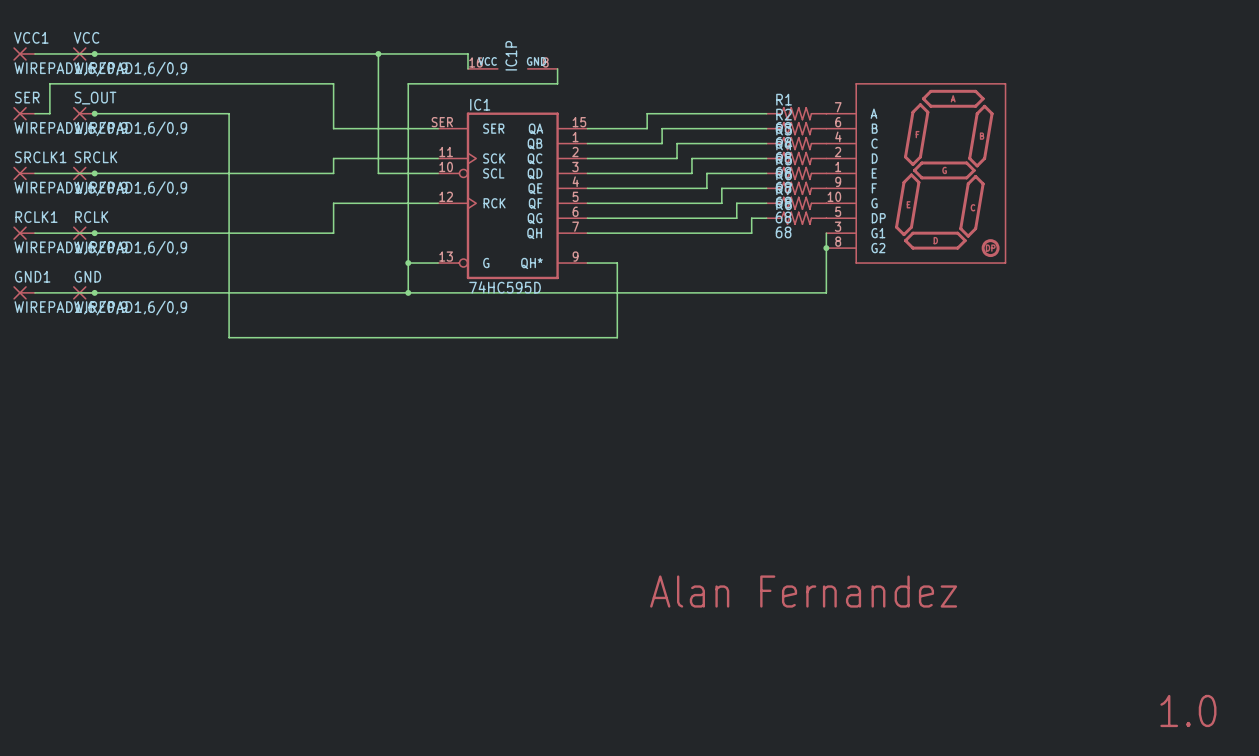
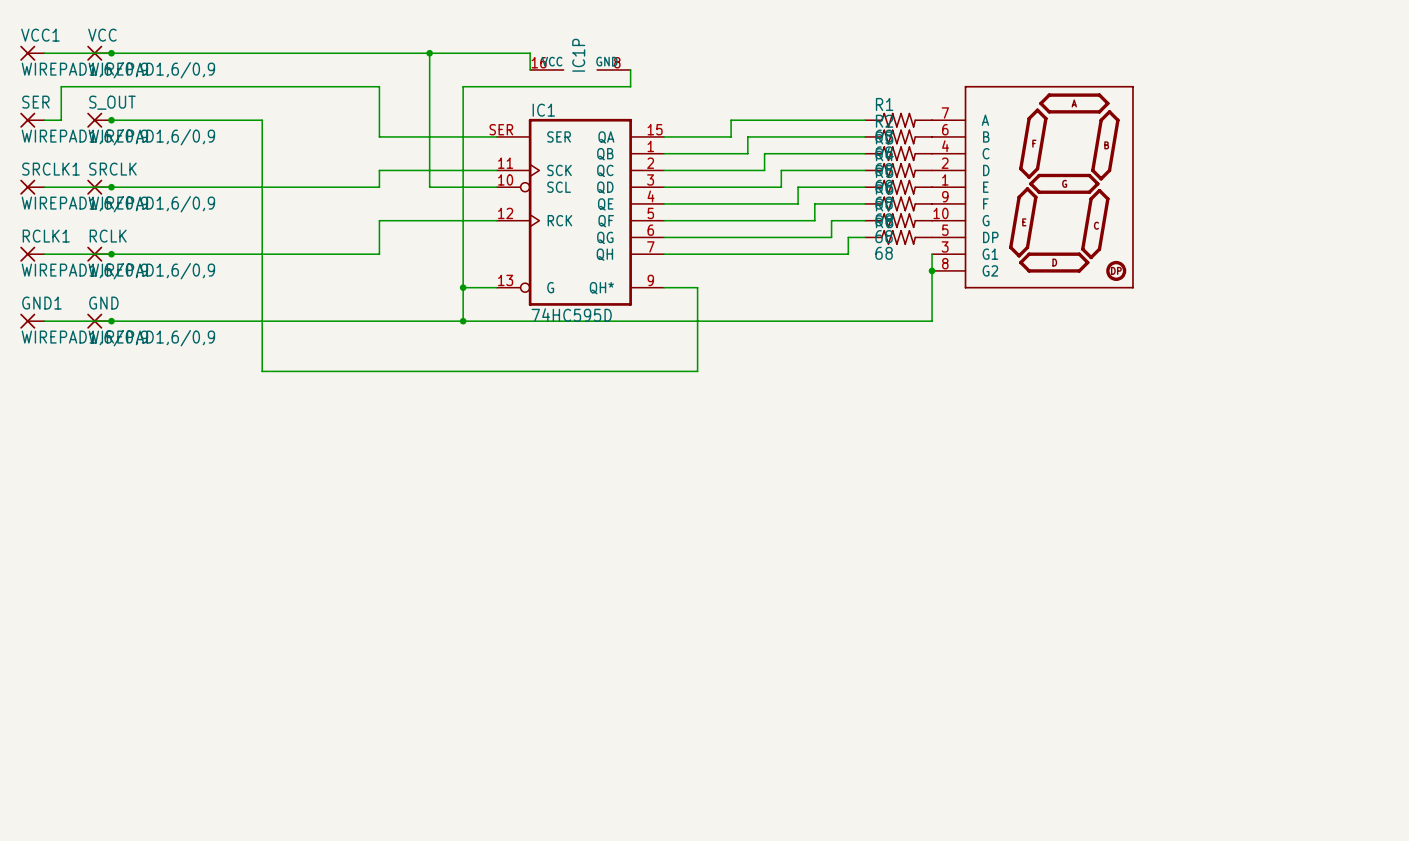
text: Alan Fernandez (803, 591) -> none
text: 1.0 (1188, 710) -> none

